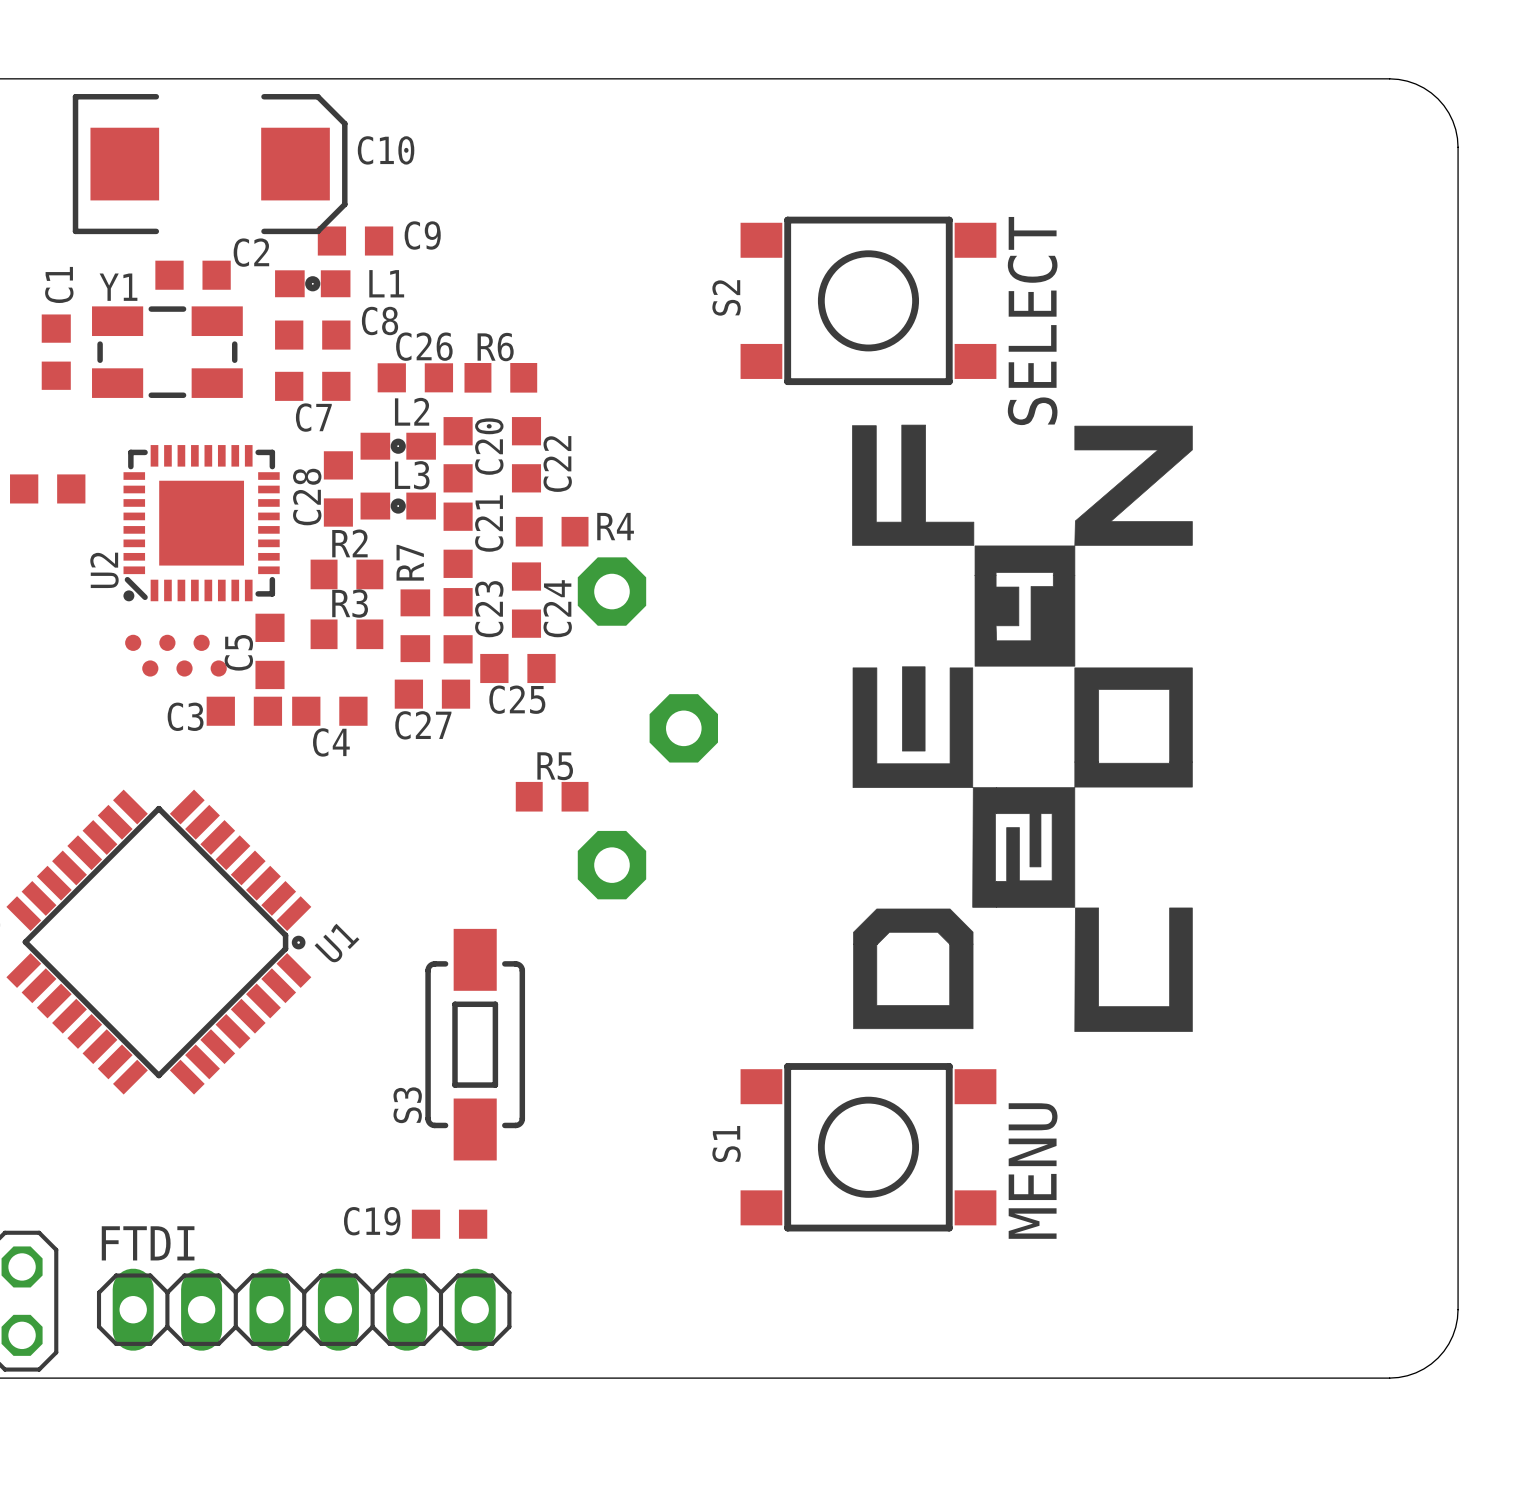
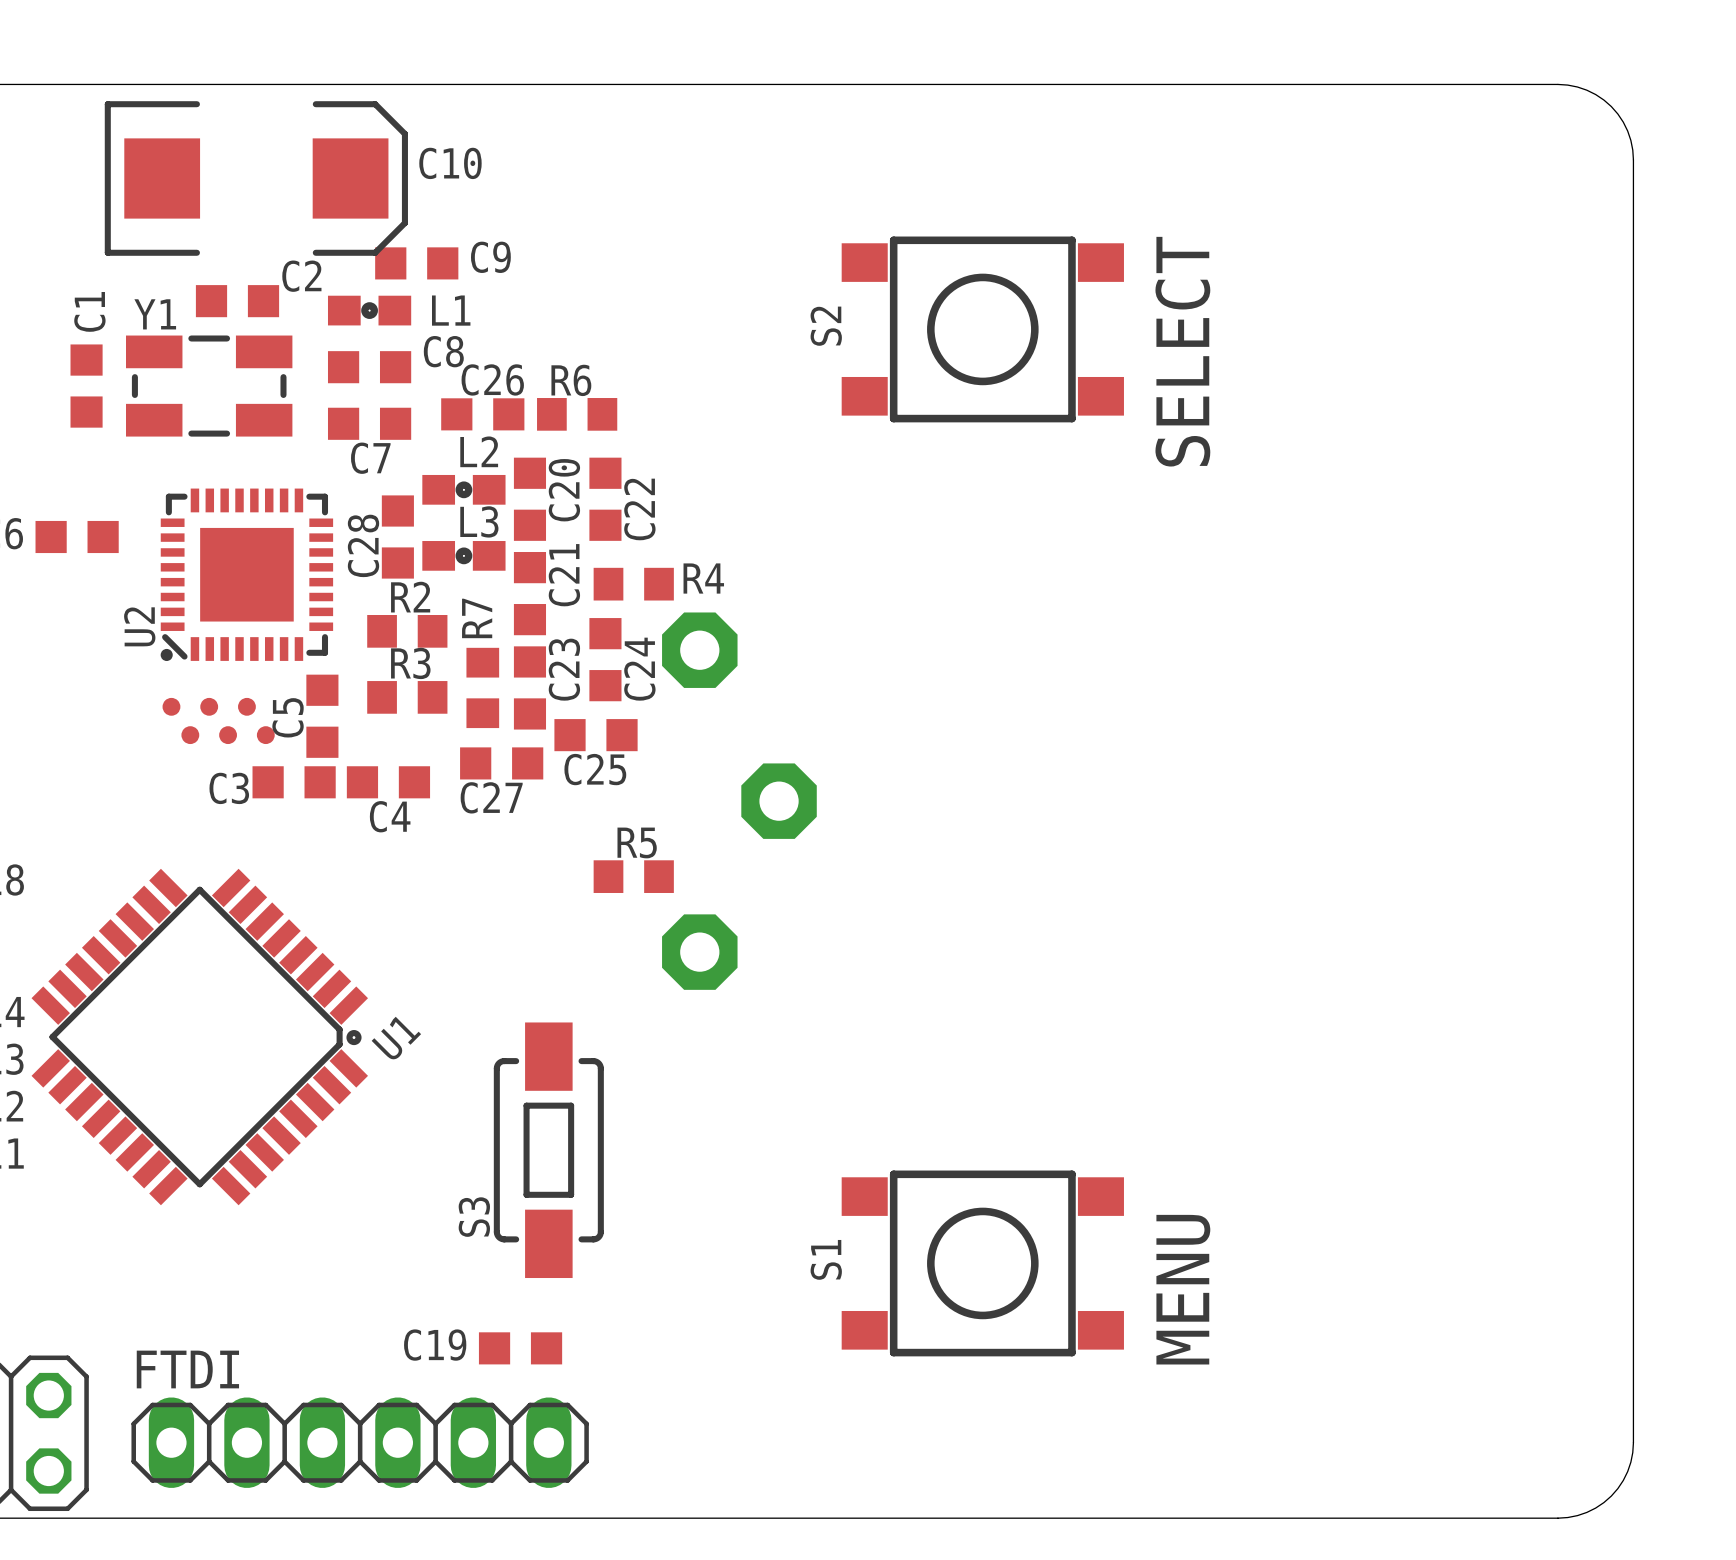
text position: SELECT (1032, 321) -> SELECT (1182, 351)
drawing: [852, 424, 1193, 1032] -> none
text position: MENU (1033, 1171) -> MENU (1183, 1289)

